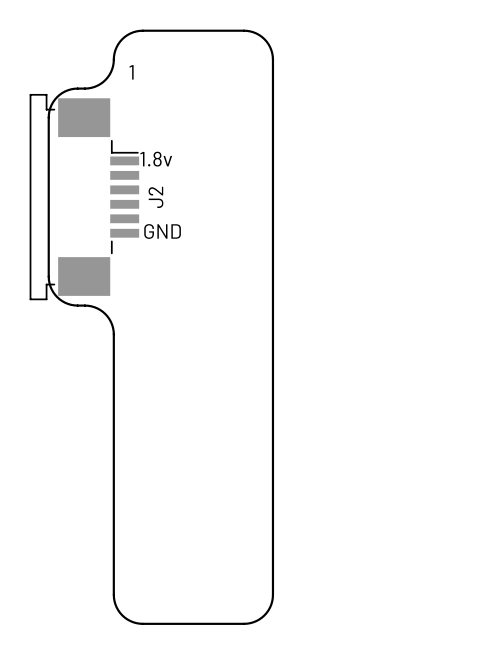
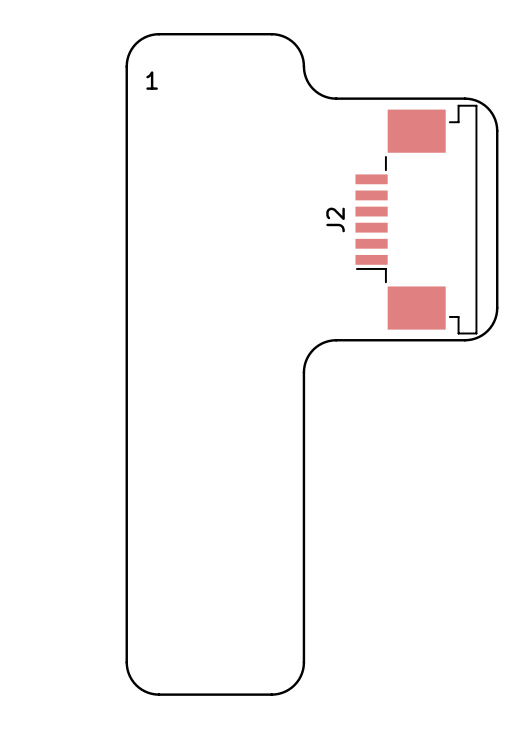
board edge: (113, 59) (110, 72) (102, 82) (91, 87) (71, 89) (62, 93) (53, 102) (48, 117) (48, 276) (50, 286) (55, 294) (65, 302) (91, 306) (102, 311) (110, 321) (113, 334) -> (126, 66) (126, 372)
board edge: (272, 59) (272, 334) -> (303, 66) (305, 77) (310, 86) (319, 93) (328, 97) (465, 98) (475, 100) (485, 105) (492, 113) (497, 130) (497, 308) (495, 318) (490, 328) (478, 337) (468, 340) (328, 341) (319, 345) (310, 352) (305, 361) (303, 372)
text: 1.8v (156, 159) -> none
J2 rotation: 0° (84, 197) -> 180° (416, 219)
J2 position: (84, 197) -> (416, 219)
text: GND (162, 231) -> none

